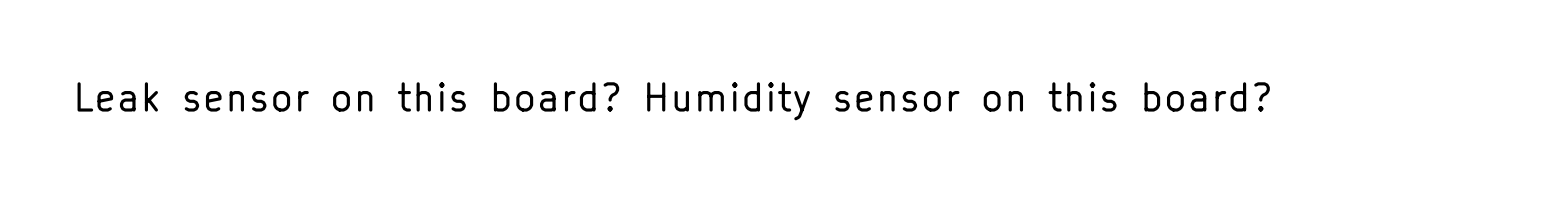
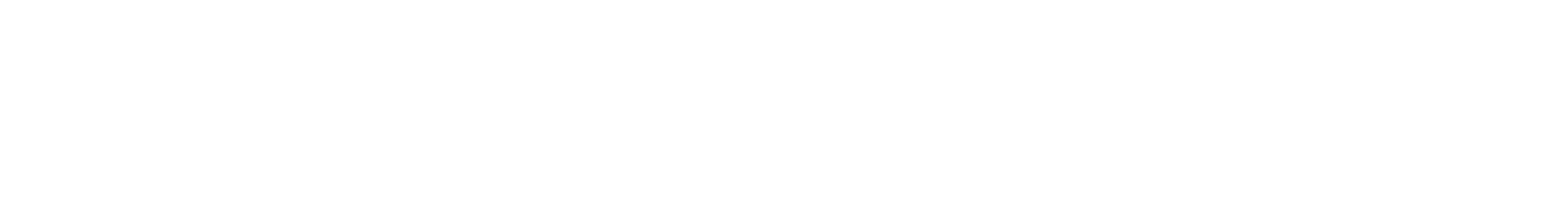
text: Leak sensor on this board? Humidity sensor on this board? (673, 101) -> none

